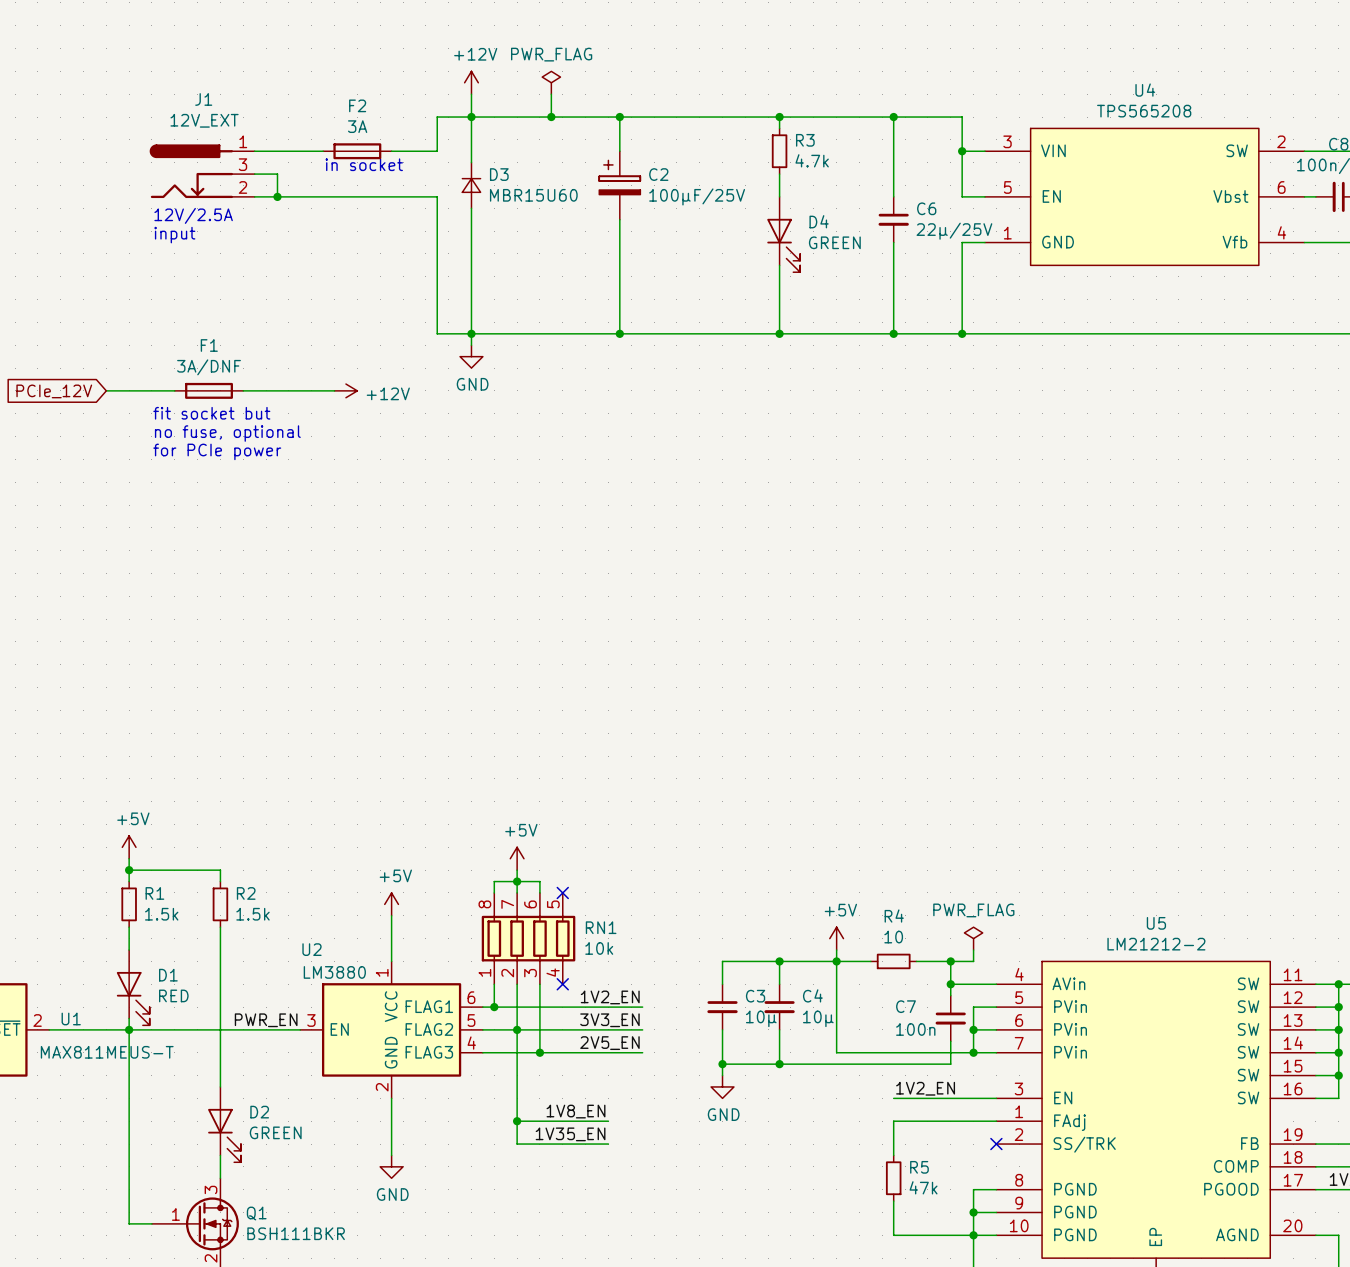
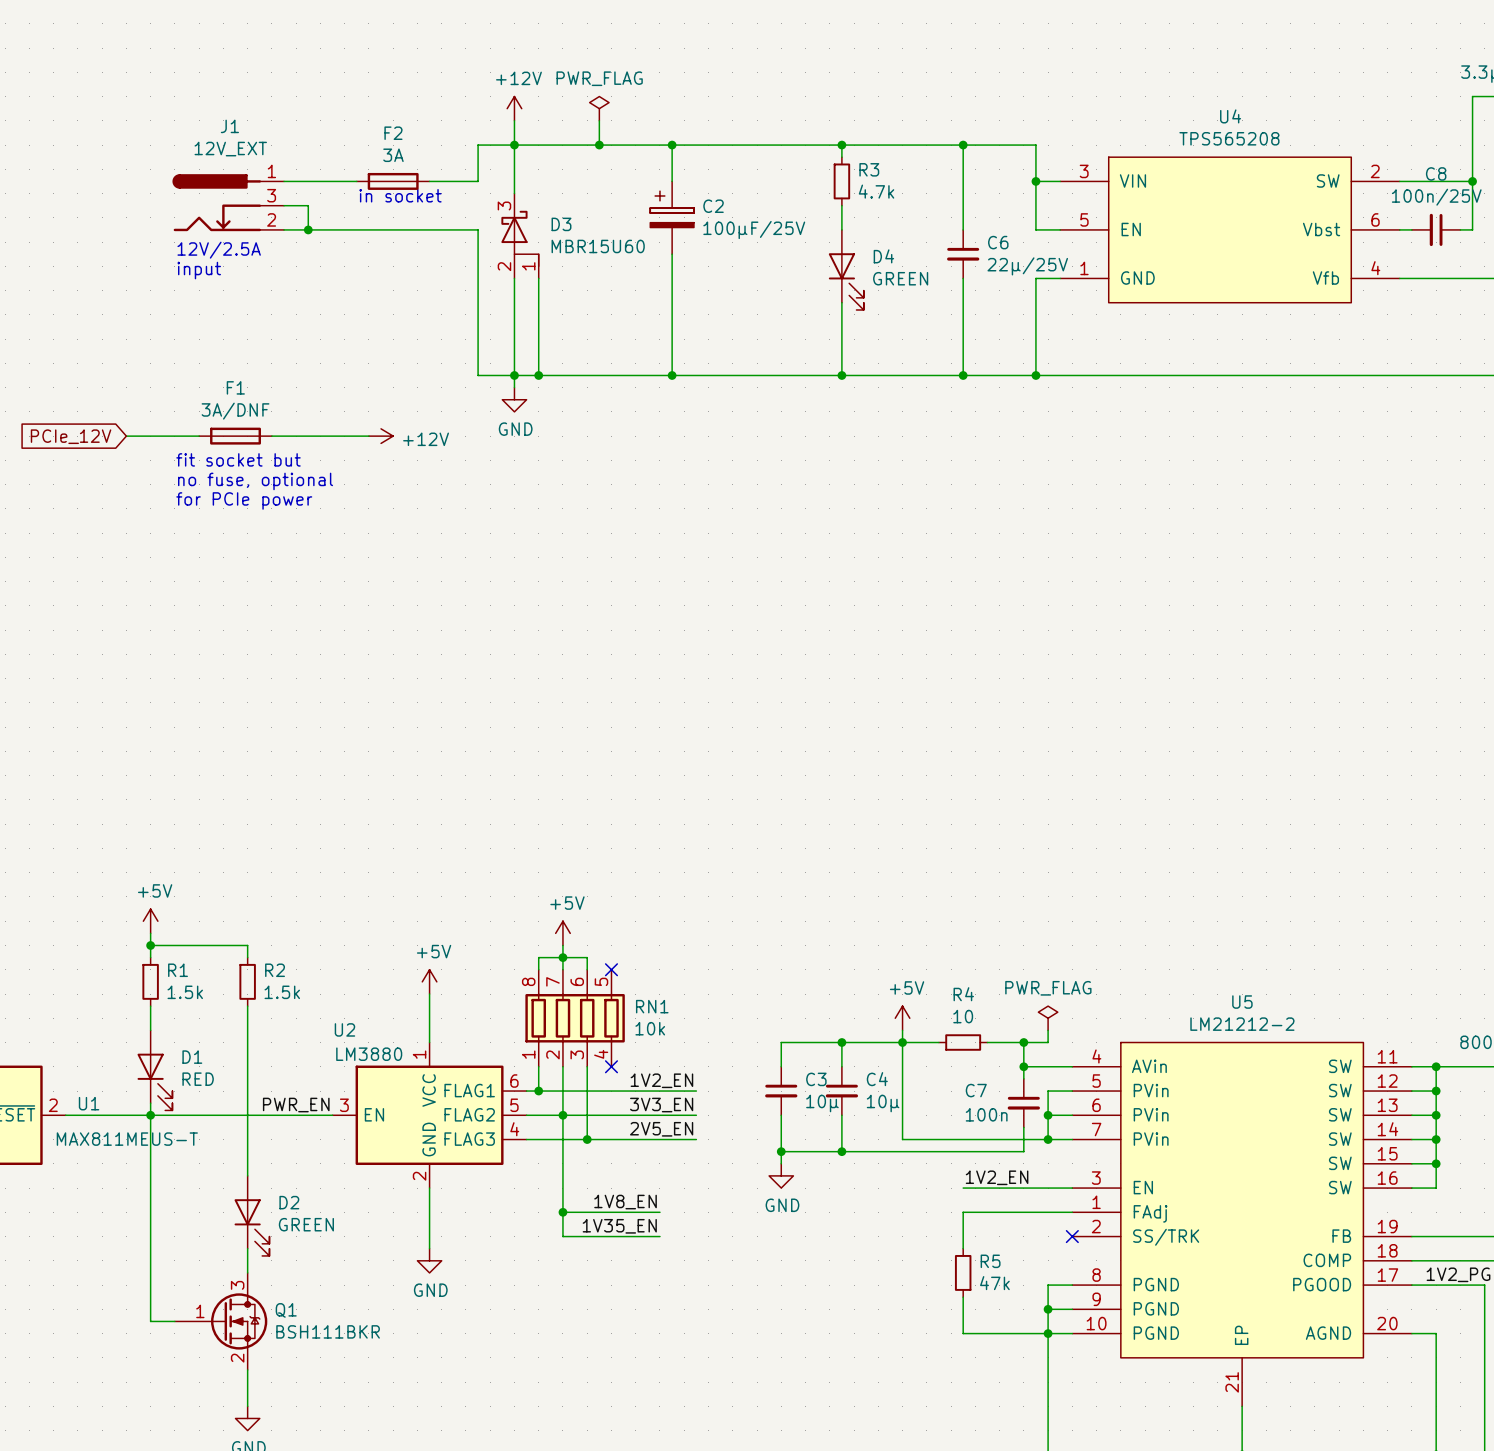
D3 symbol: [462, 162, 481, 209] -> [501, 193, 539, 279]
wire: none -> (538, 278) (538, 375)
junction: none -> (538, 375)

